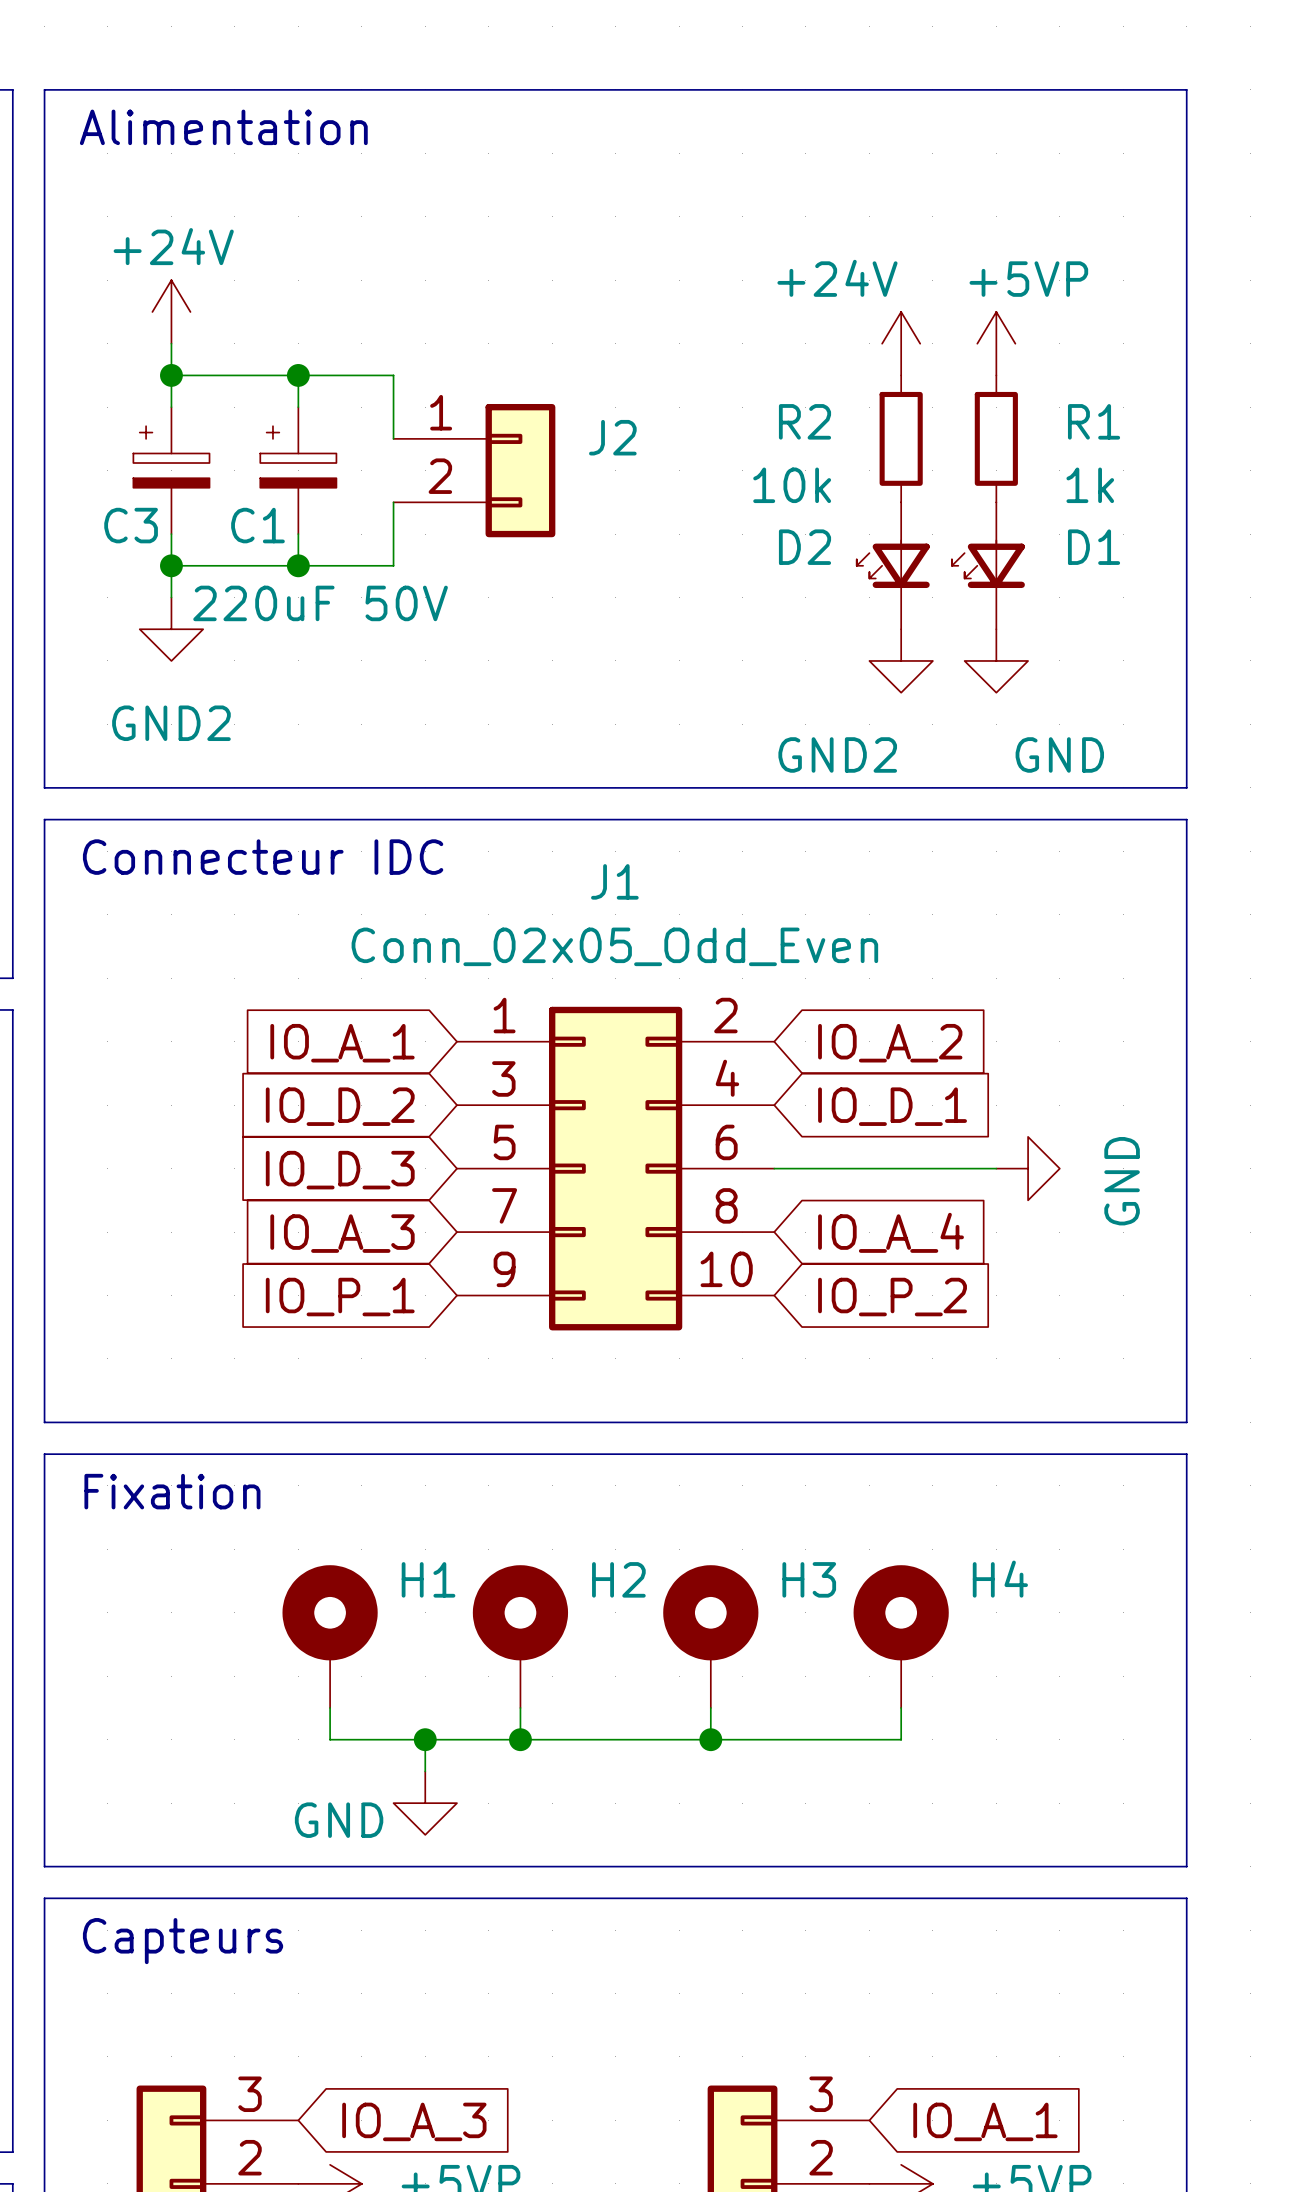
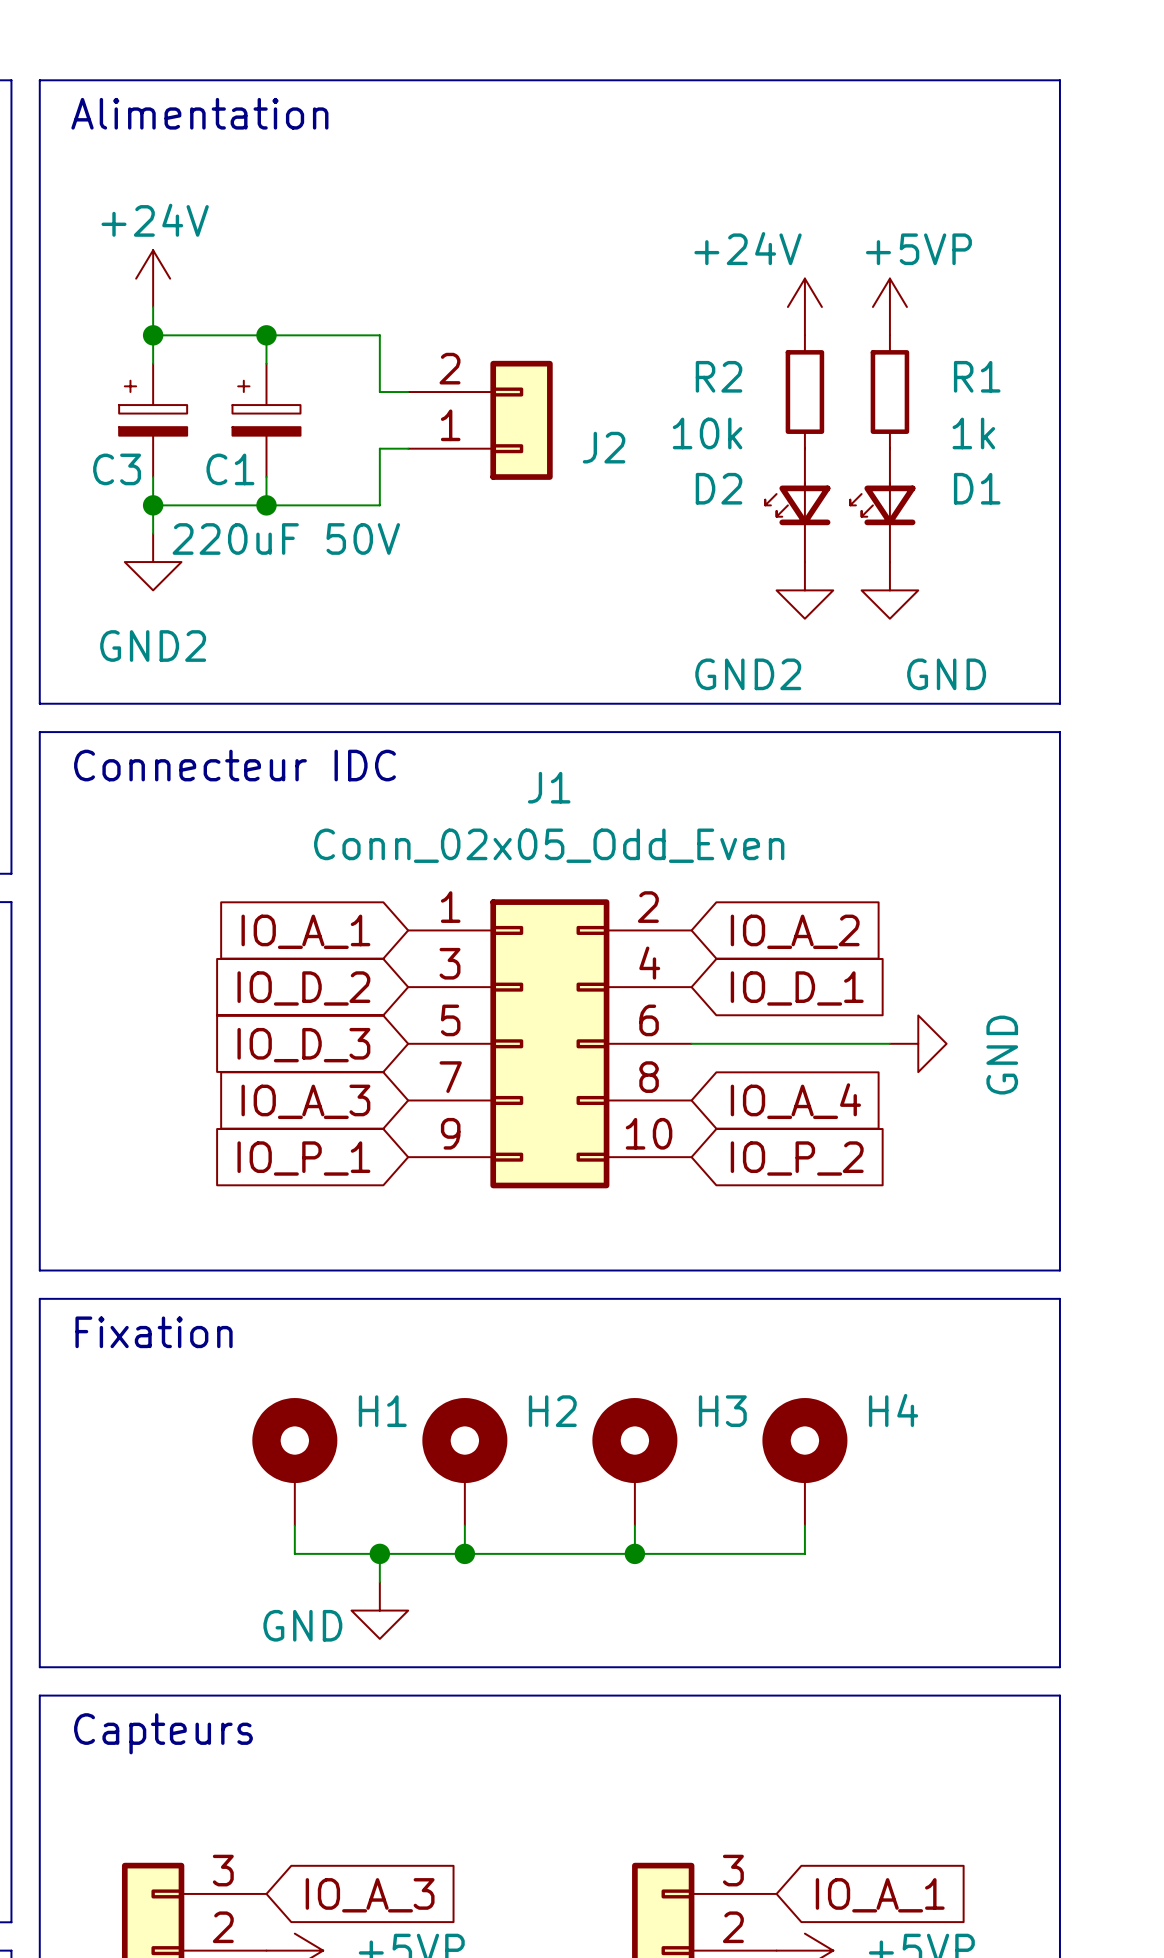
wire: (393, 375) (393, 438) -> (351, 335) (379, 335) (379, 392) (408, 392)
J2 flip: as is (520, 470) -> up-down (521, 420)
wire: (393, 502) (393, 565) -> (408, 448) (379, 448) (379, 505) (351, 505)

